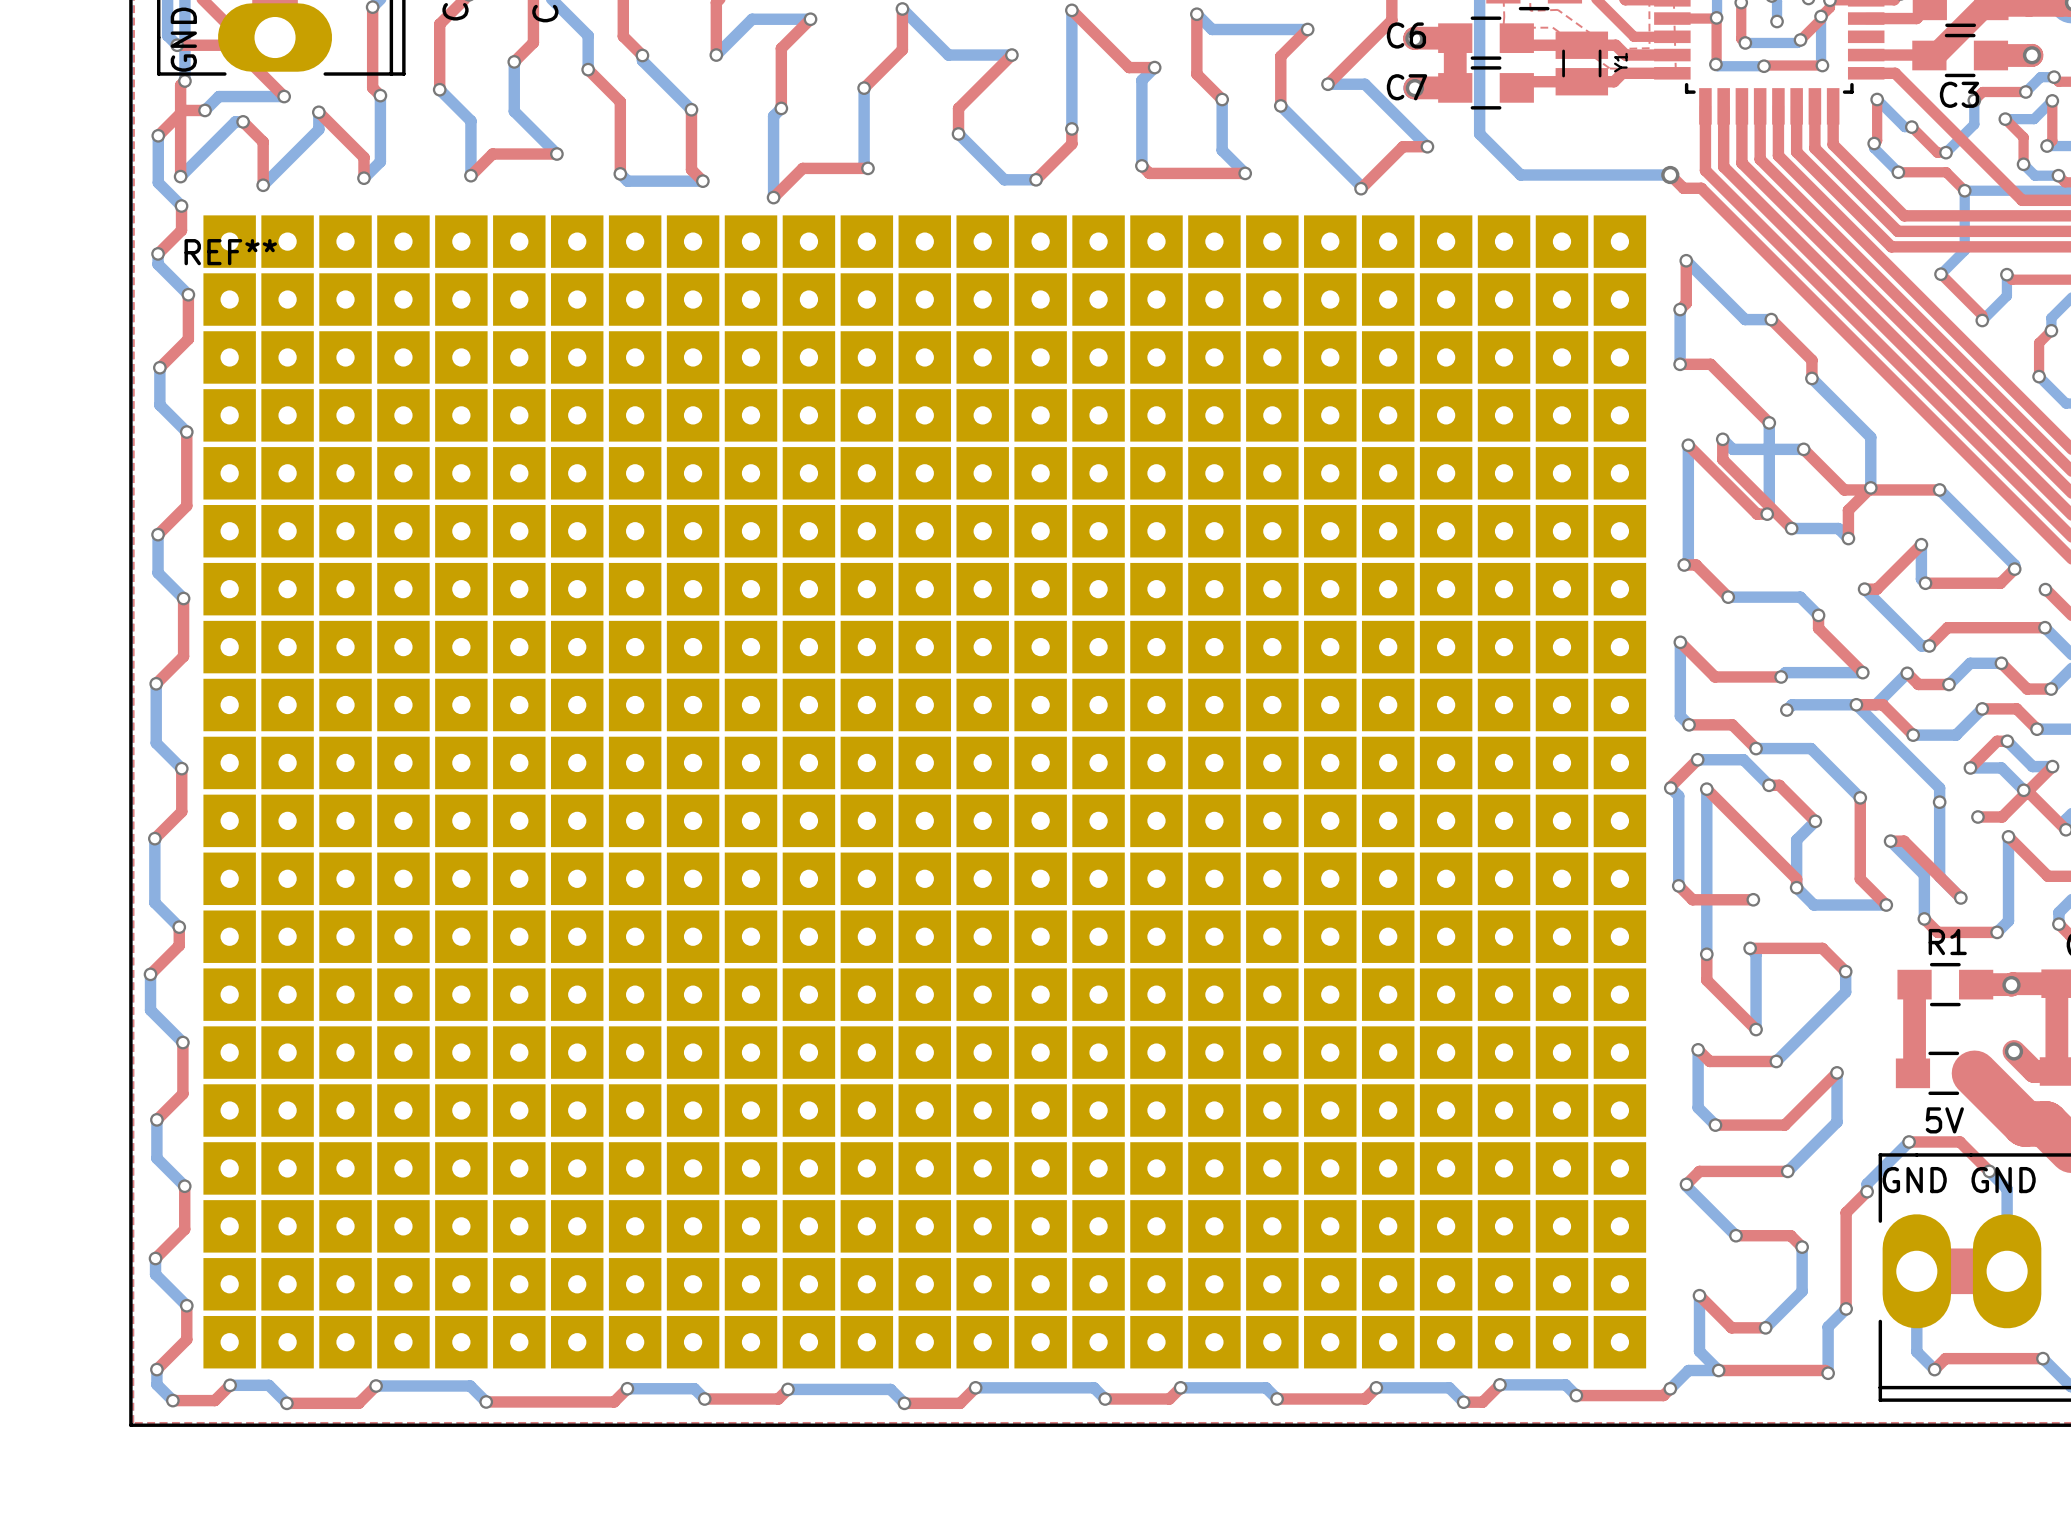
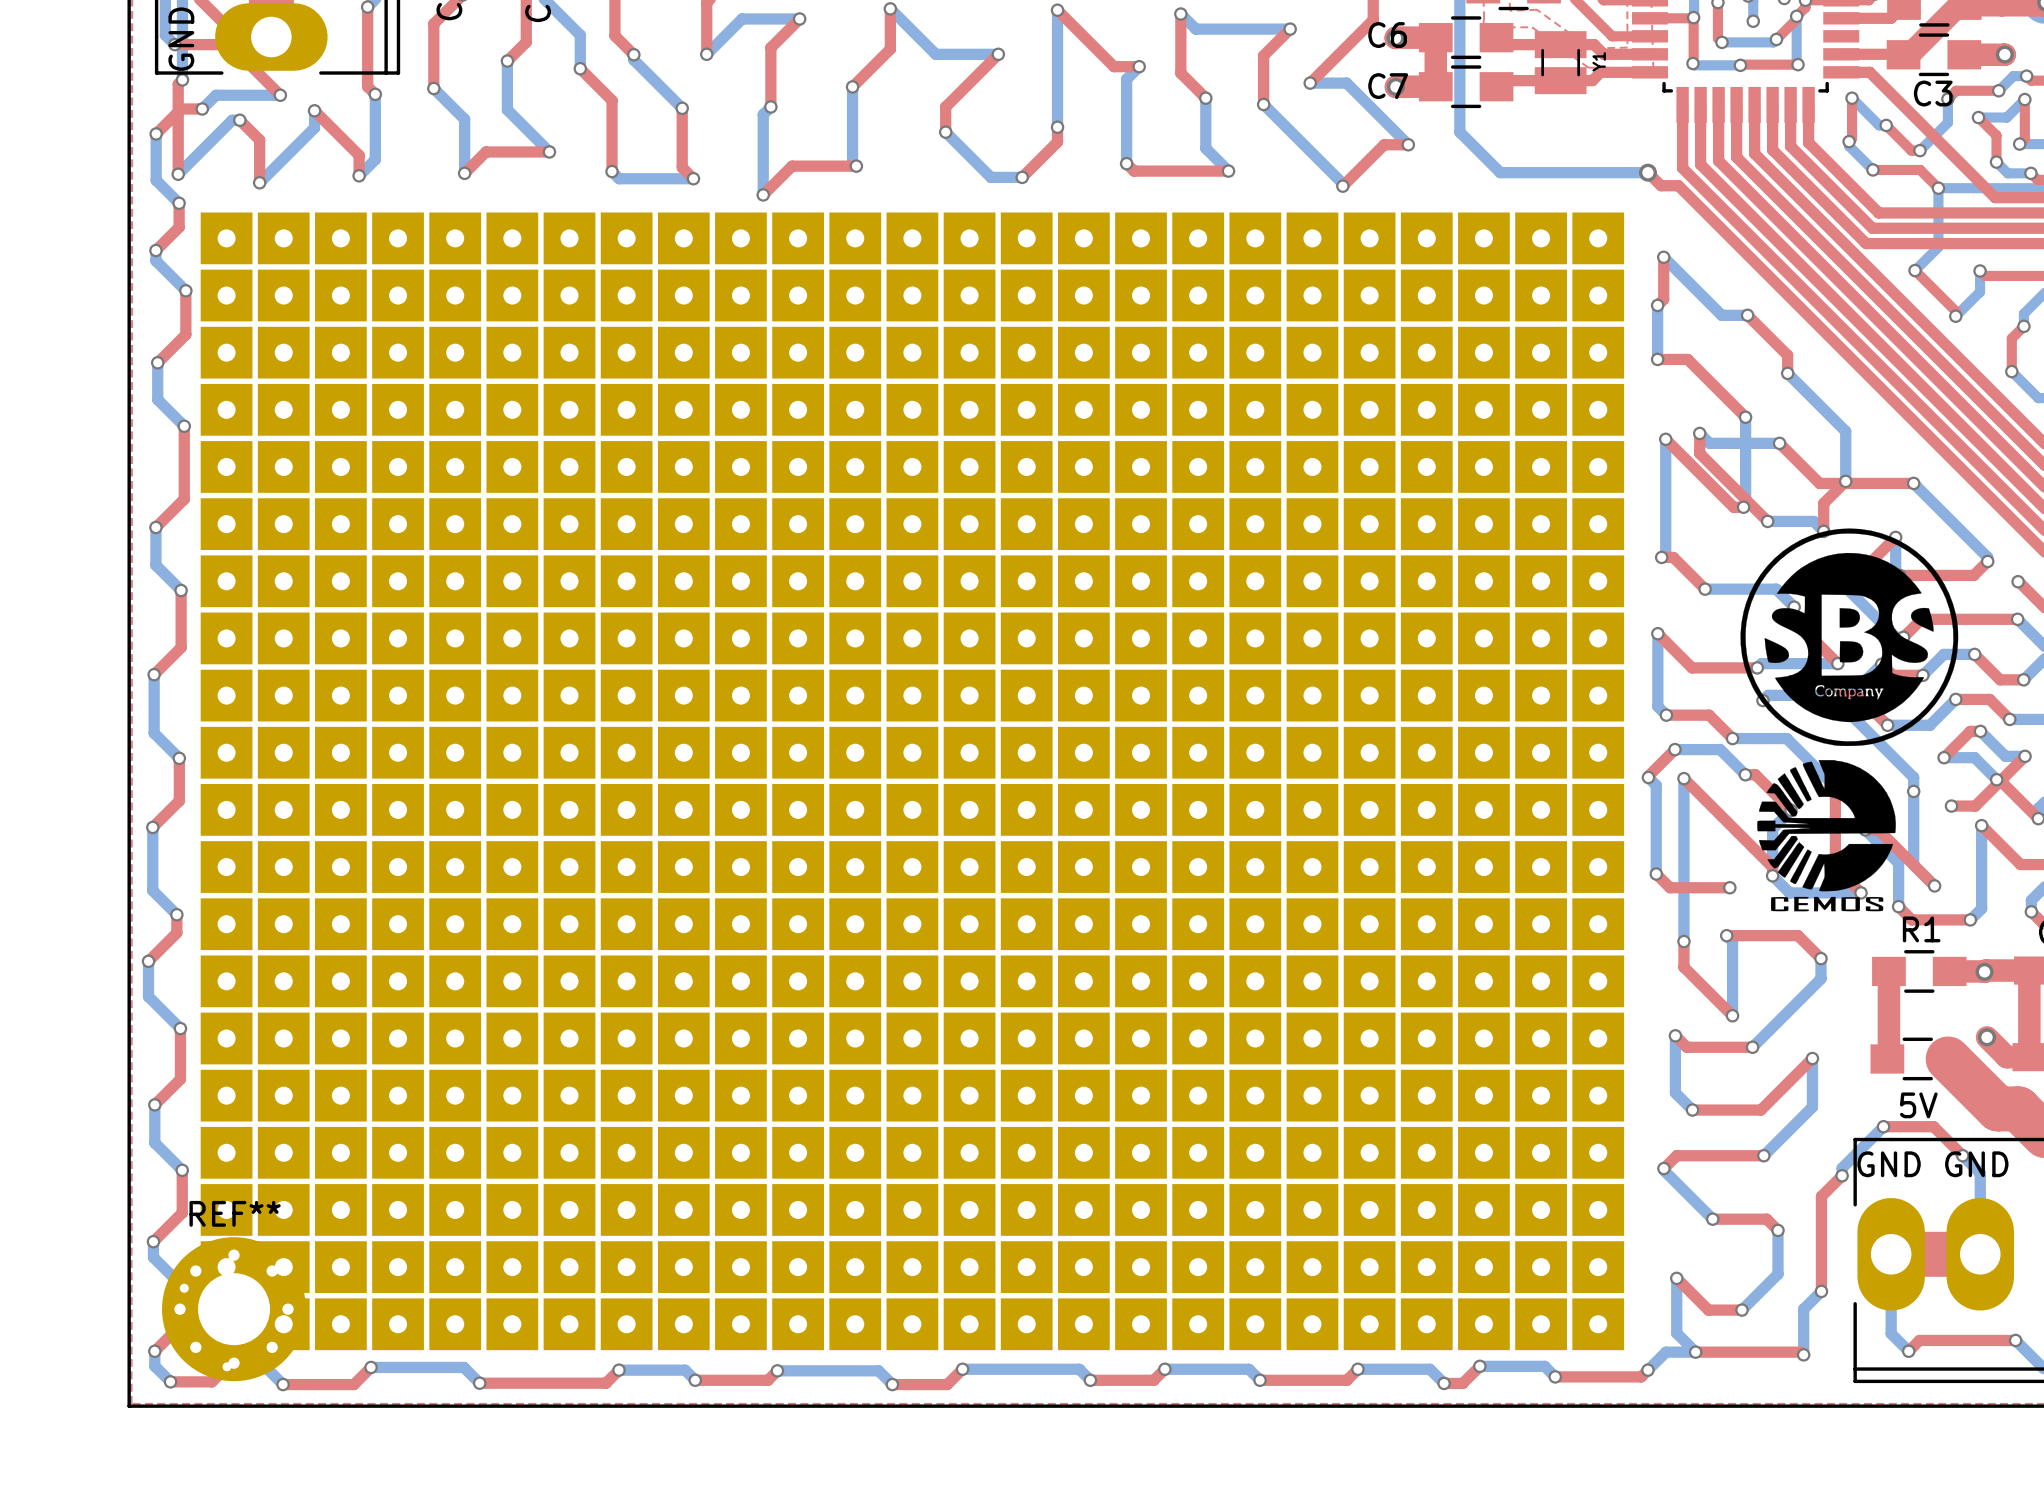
REF** name: REF** (230, 252) -> none
drawing: none -> [1740, 528, 1959, 912]
REF**: none -> (234, 1309)

